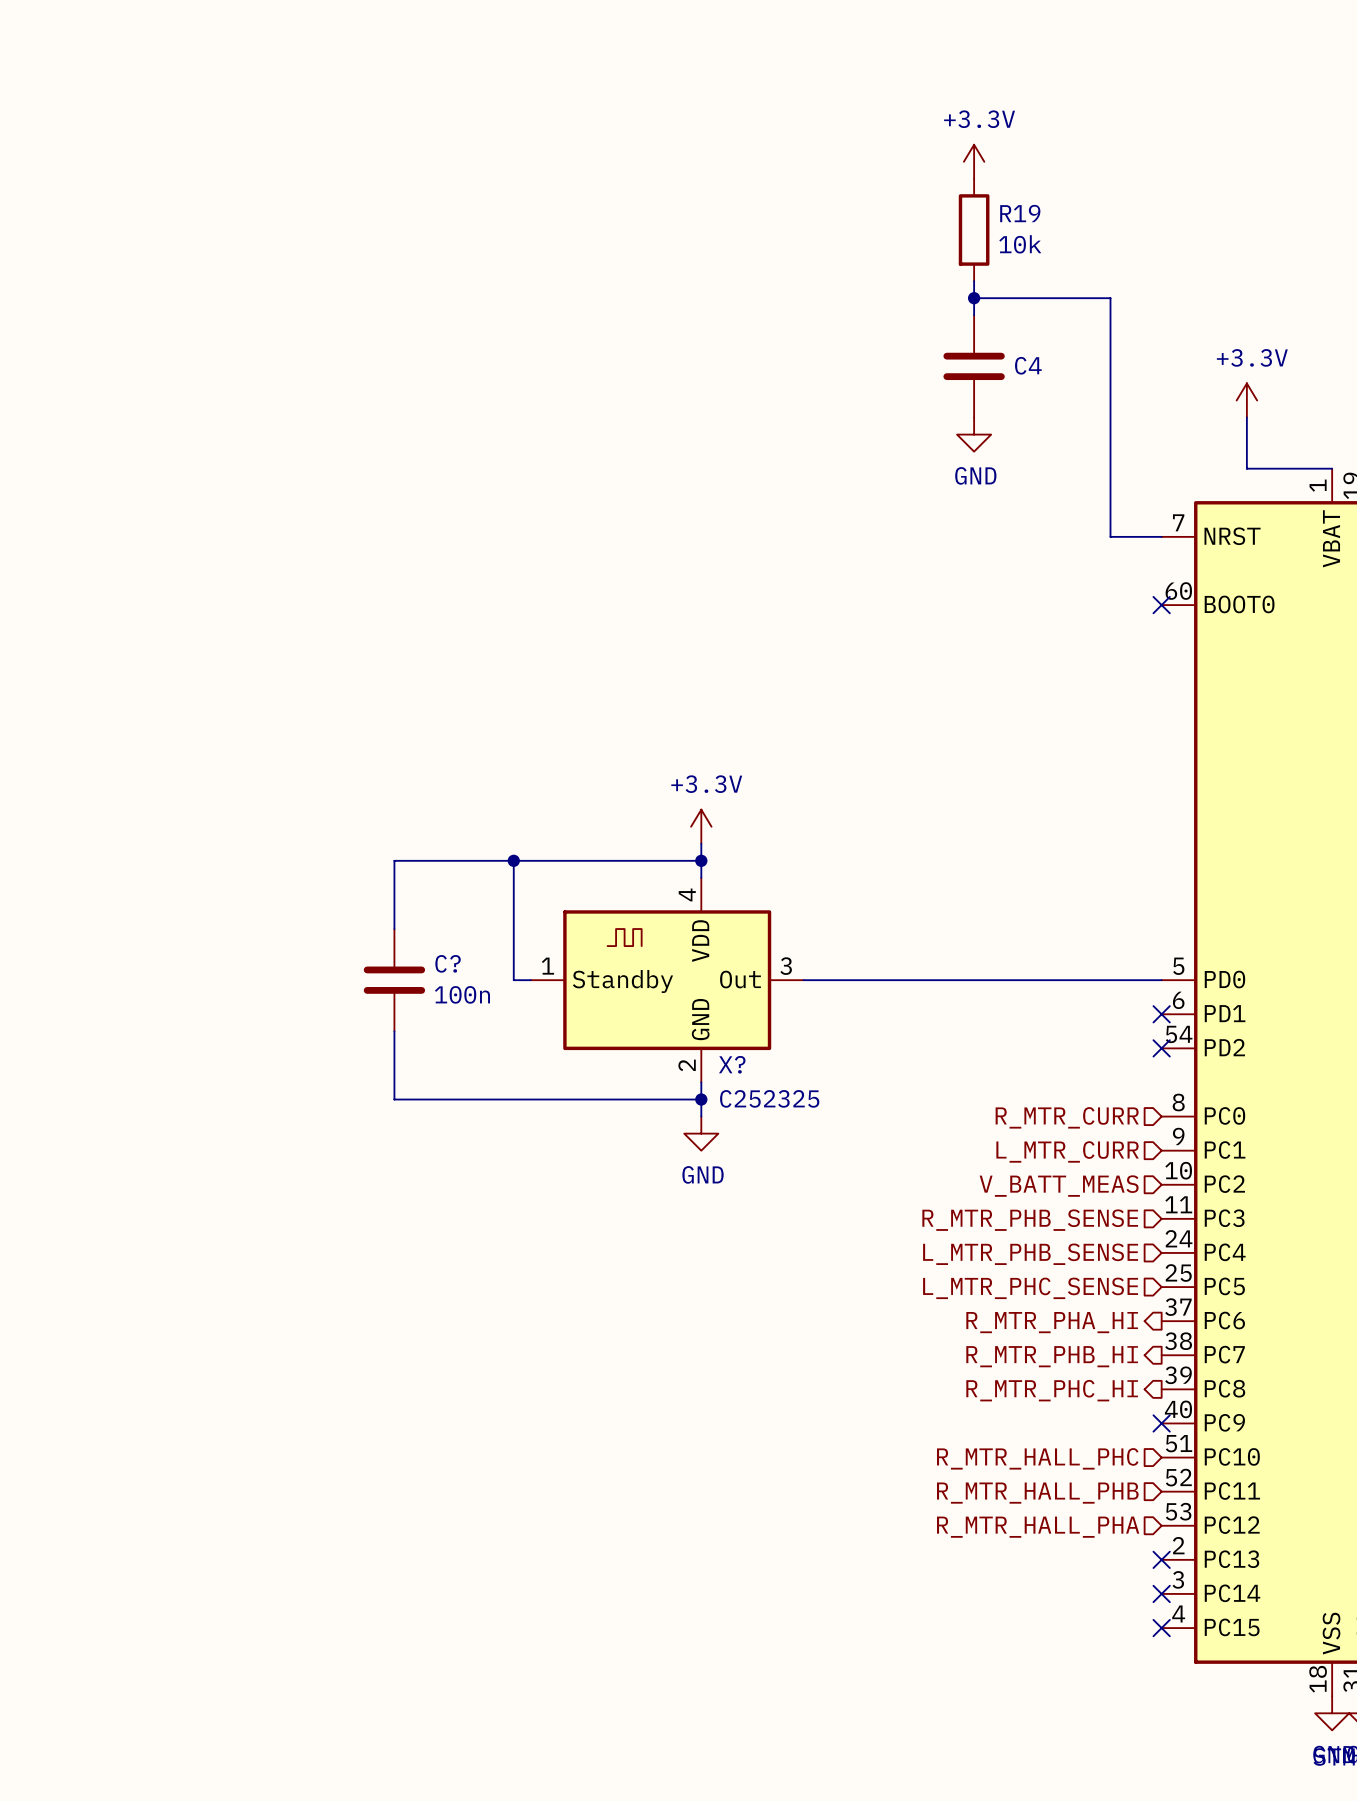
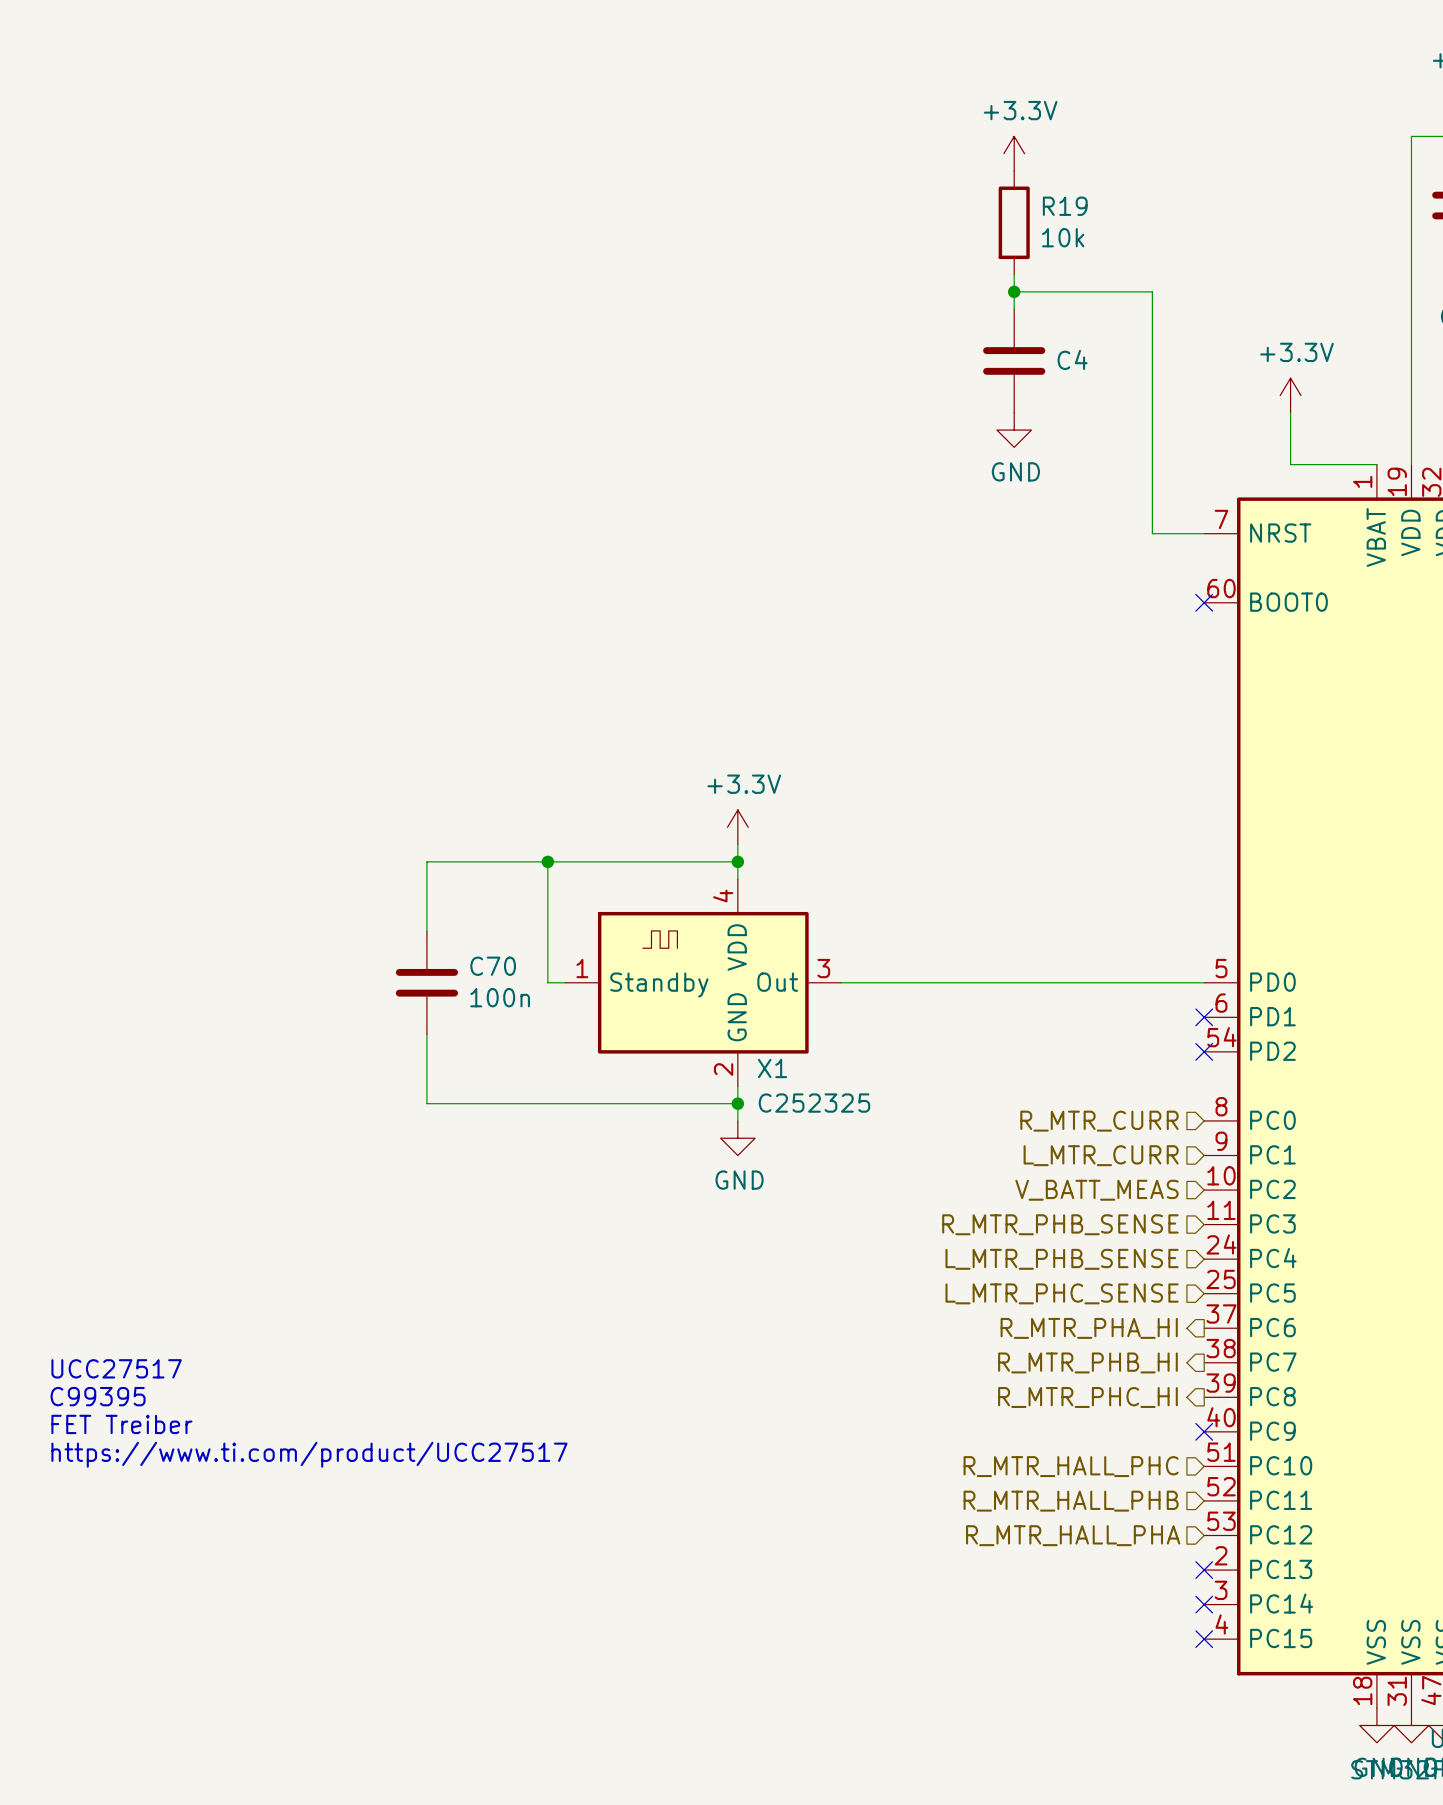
C? name: C? (448, 963) -> C70 (493, 966)
X? name: X? (732, 1064) -> X1 (772, 1068)
text: none -> UCC27517 (116, 1368)
text: none -> C99395 (98, 1396)
text: none -> FET Treiber (121, 1424)
text: none -> https://www.ti.com/product/UCC27517 (309, 1454)

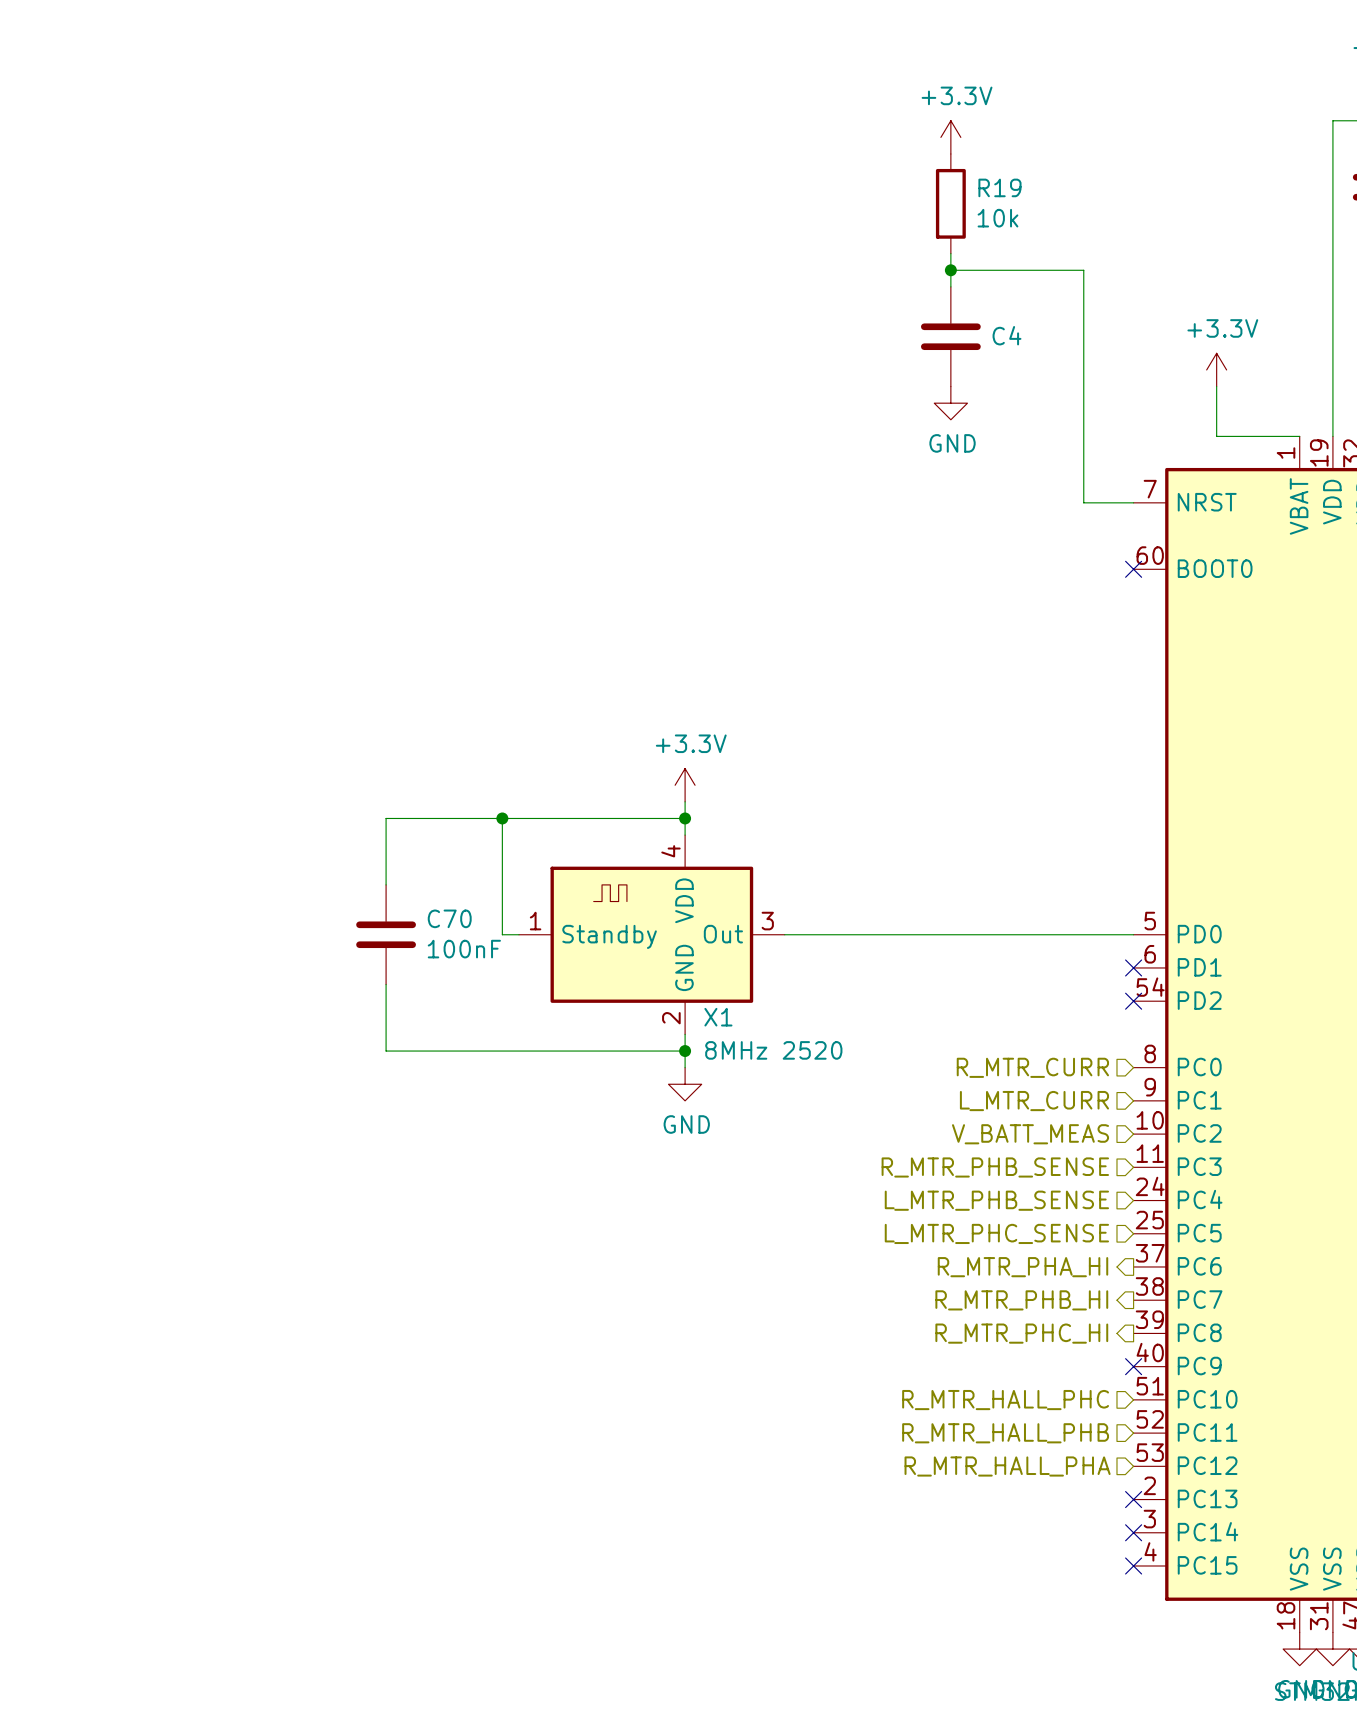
C70 value: 100n (500, 997) -> 100nF (464, 949)
X1 value: C252325 (814, 1103) -> 8MHz 2520 (773, 1050)
text: UCC27517 (116, 1368) -> none
text: C99395 (98, 1396) -> none
text: FET Treiber (121, 1424) -> none
text: https://www.ti.com/product/UCC27517 (309, 1454) -> none

